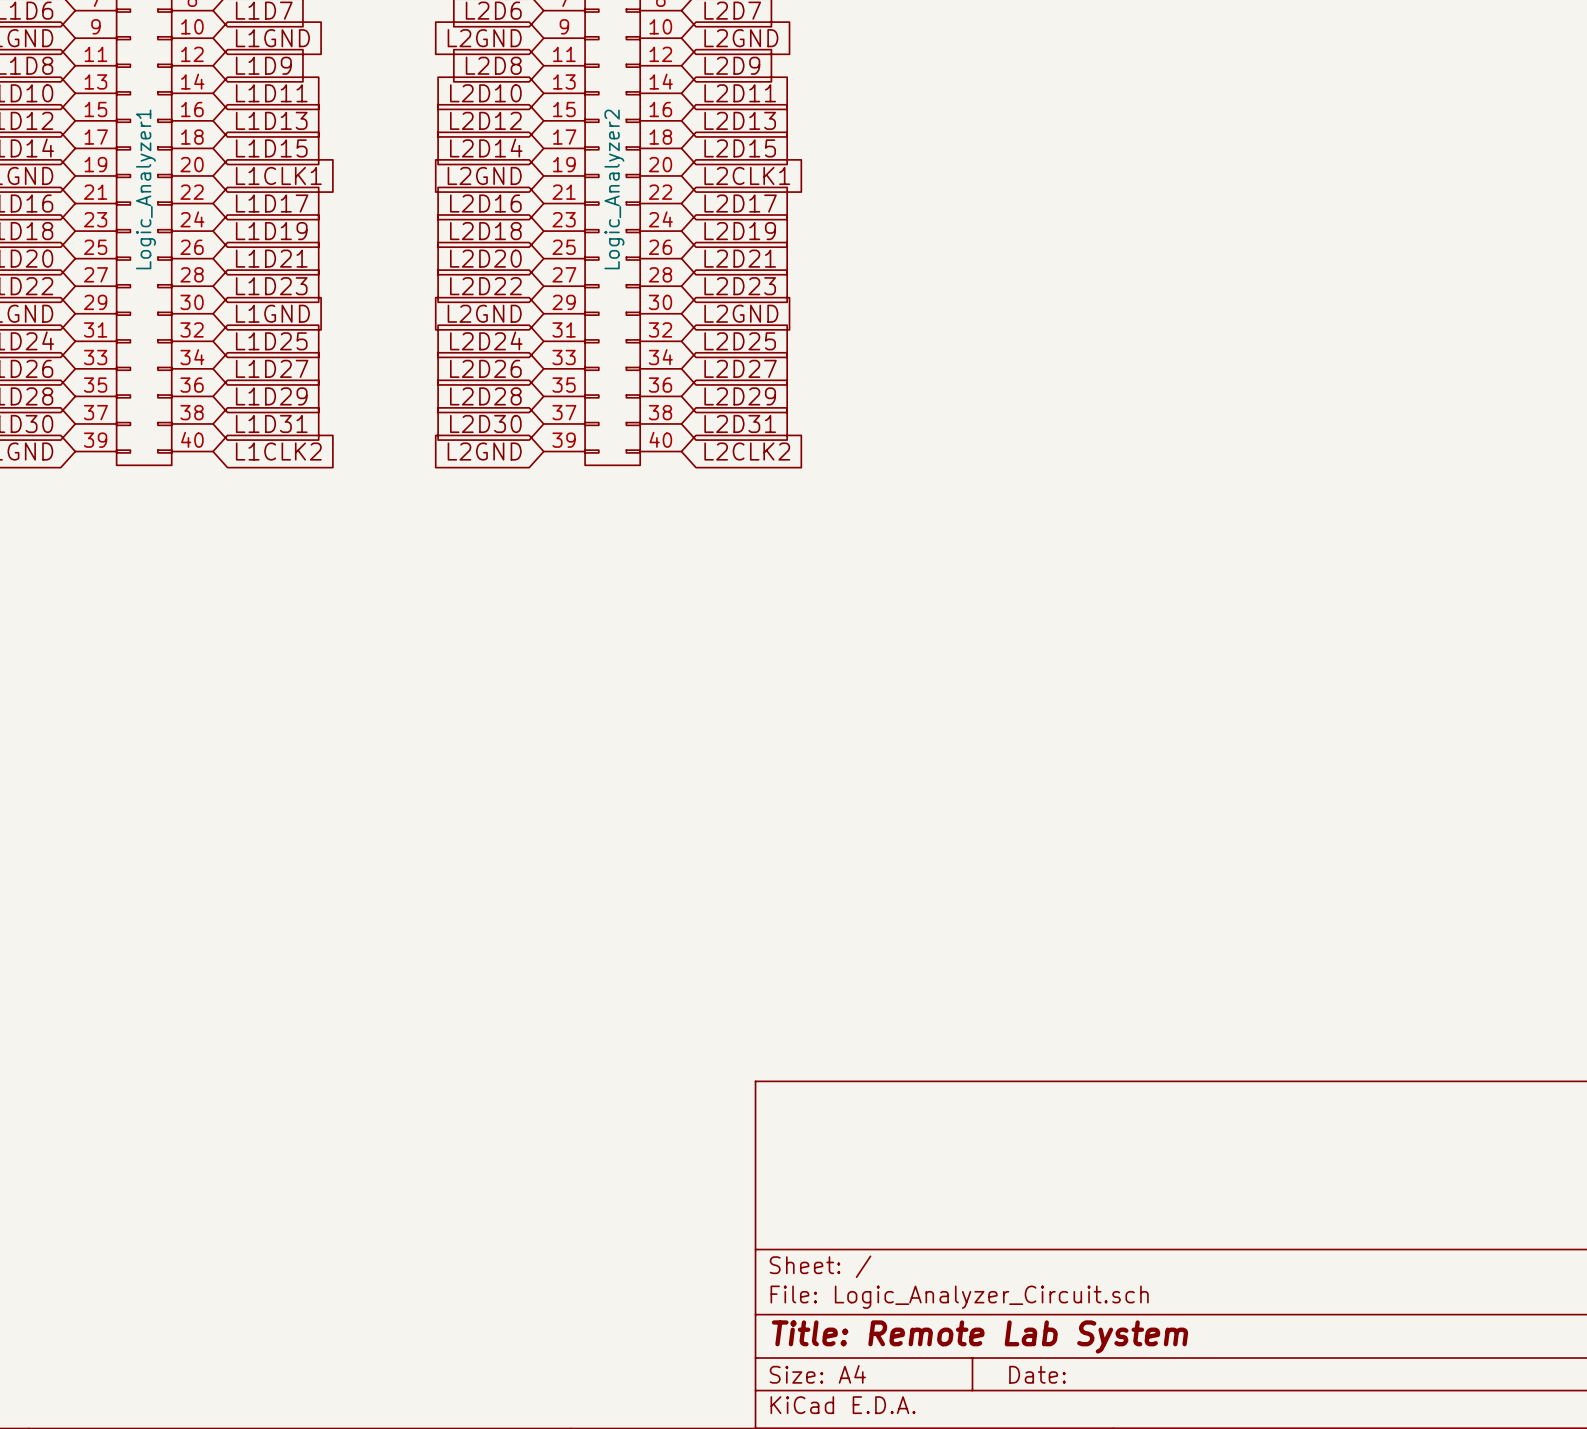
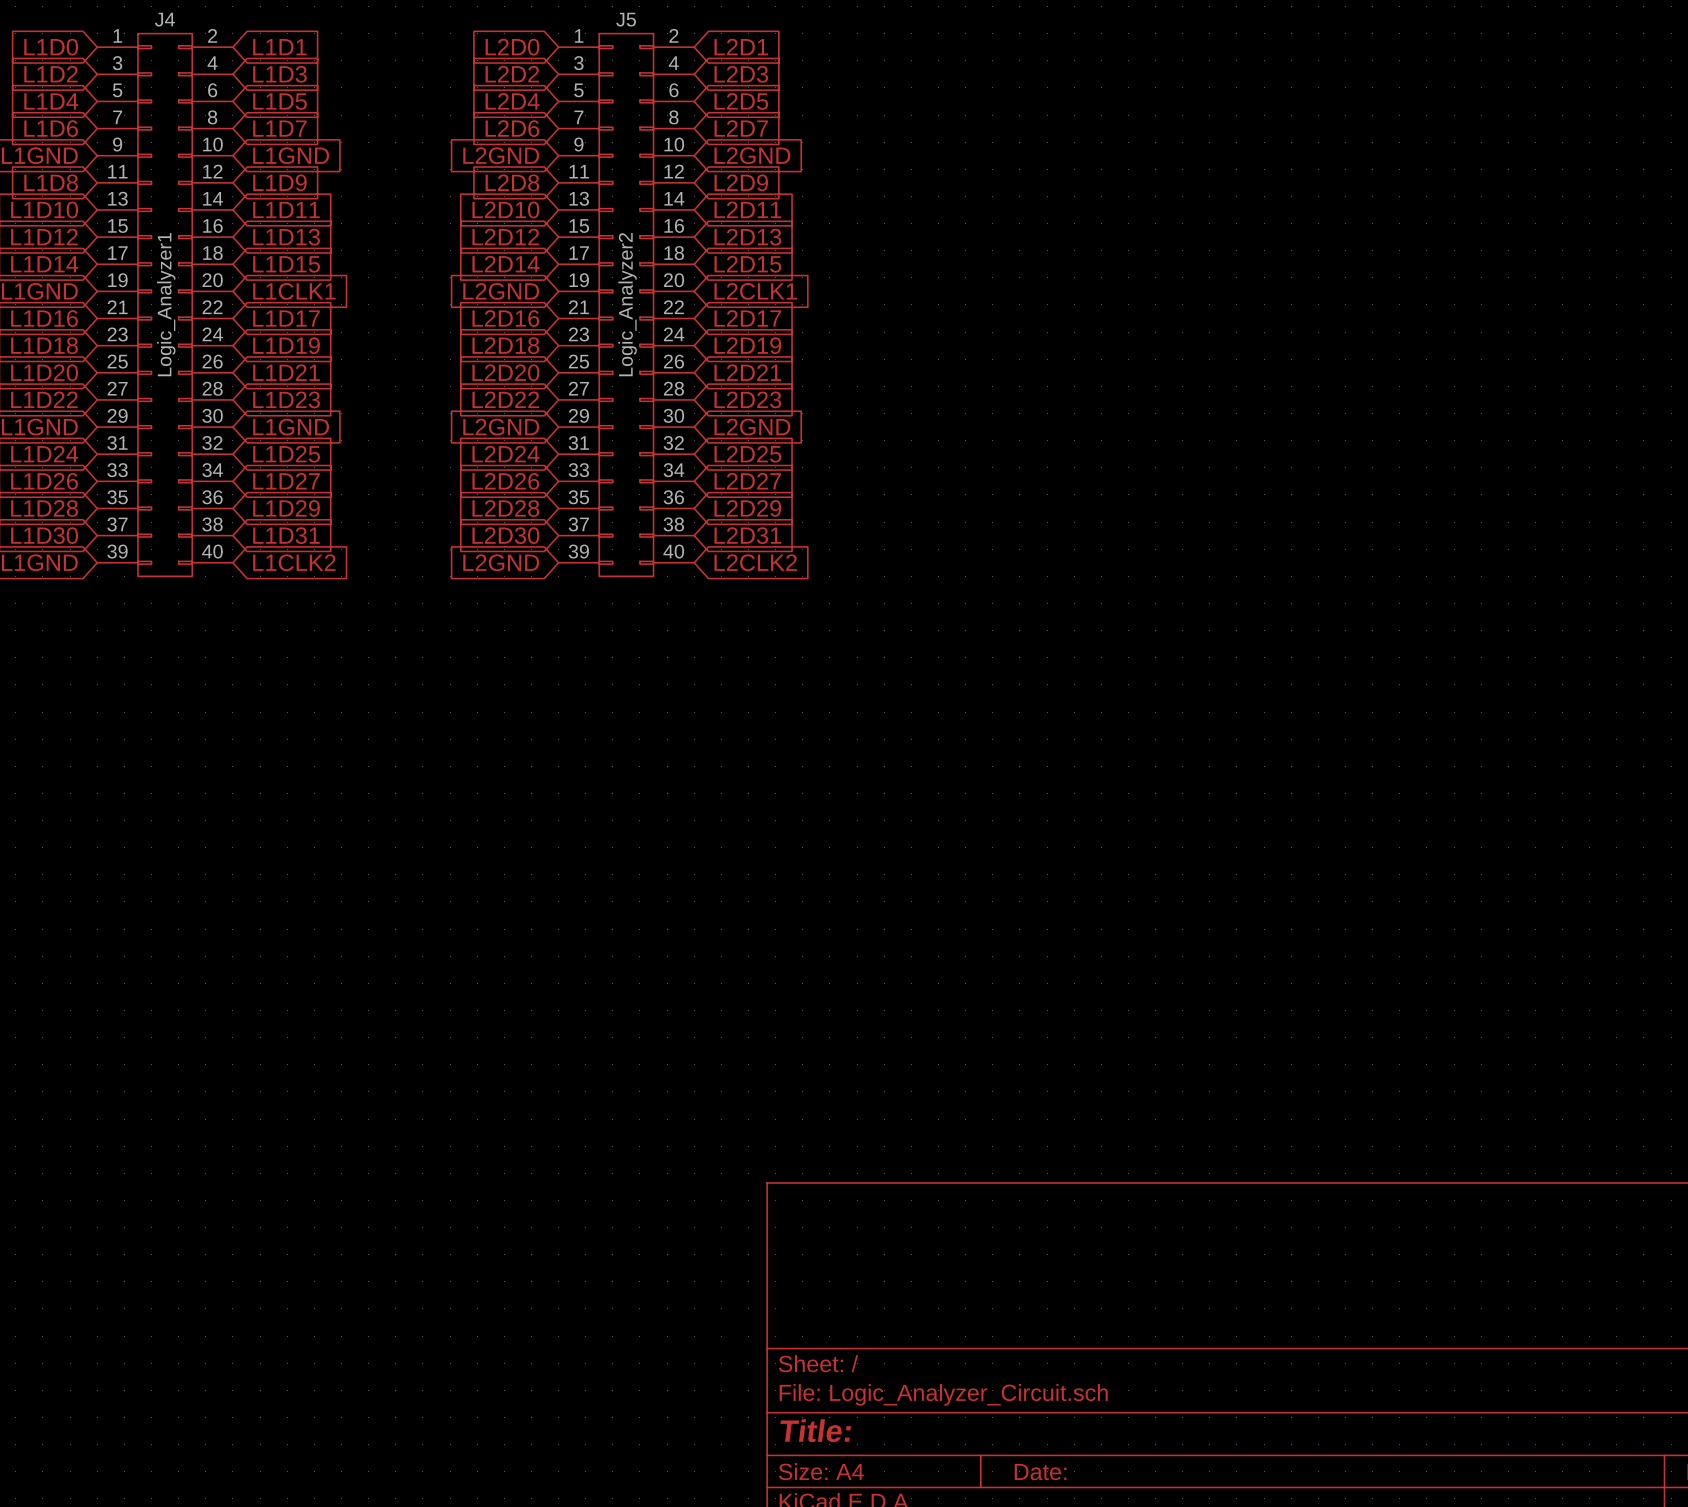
title block: Title: Remote Lab System (980, 1336) -> Title: (815, 1430)

